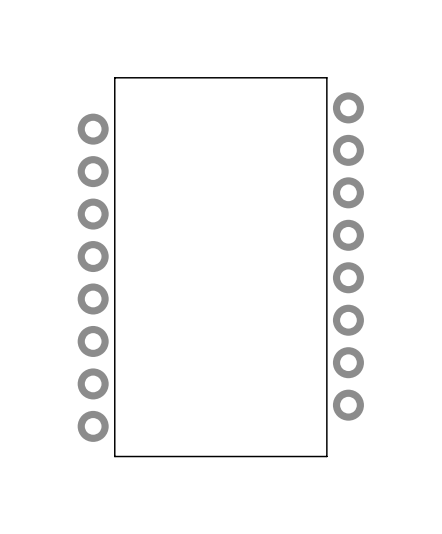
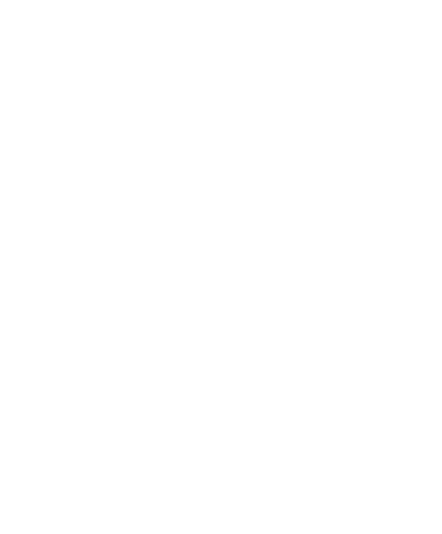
part: (220, 267) -> none

